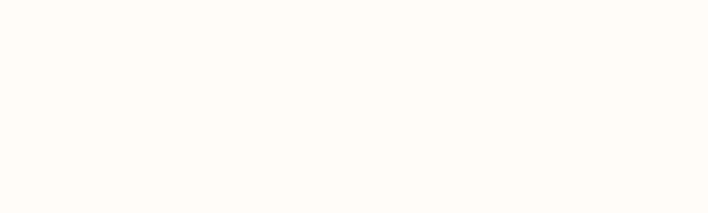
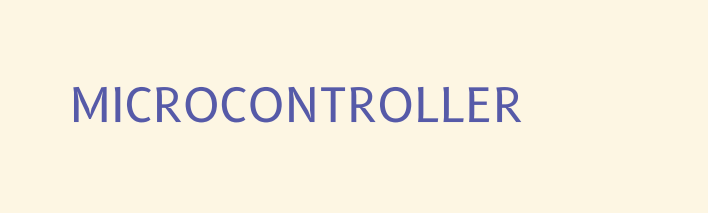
text: none -> MICROCONTROLLER (297, 104)

